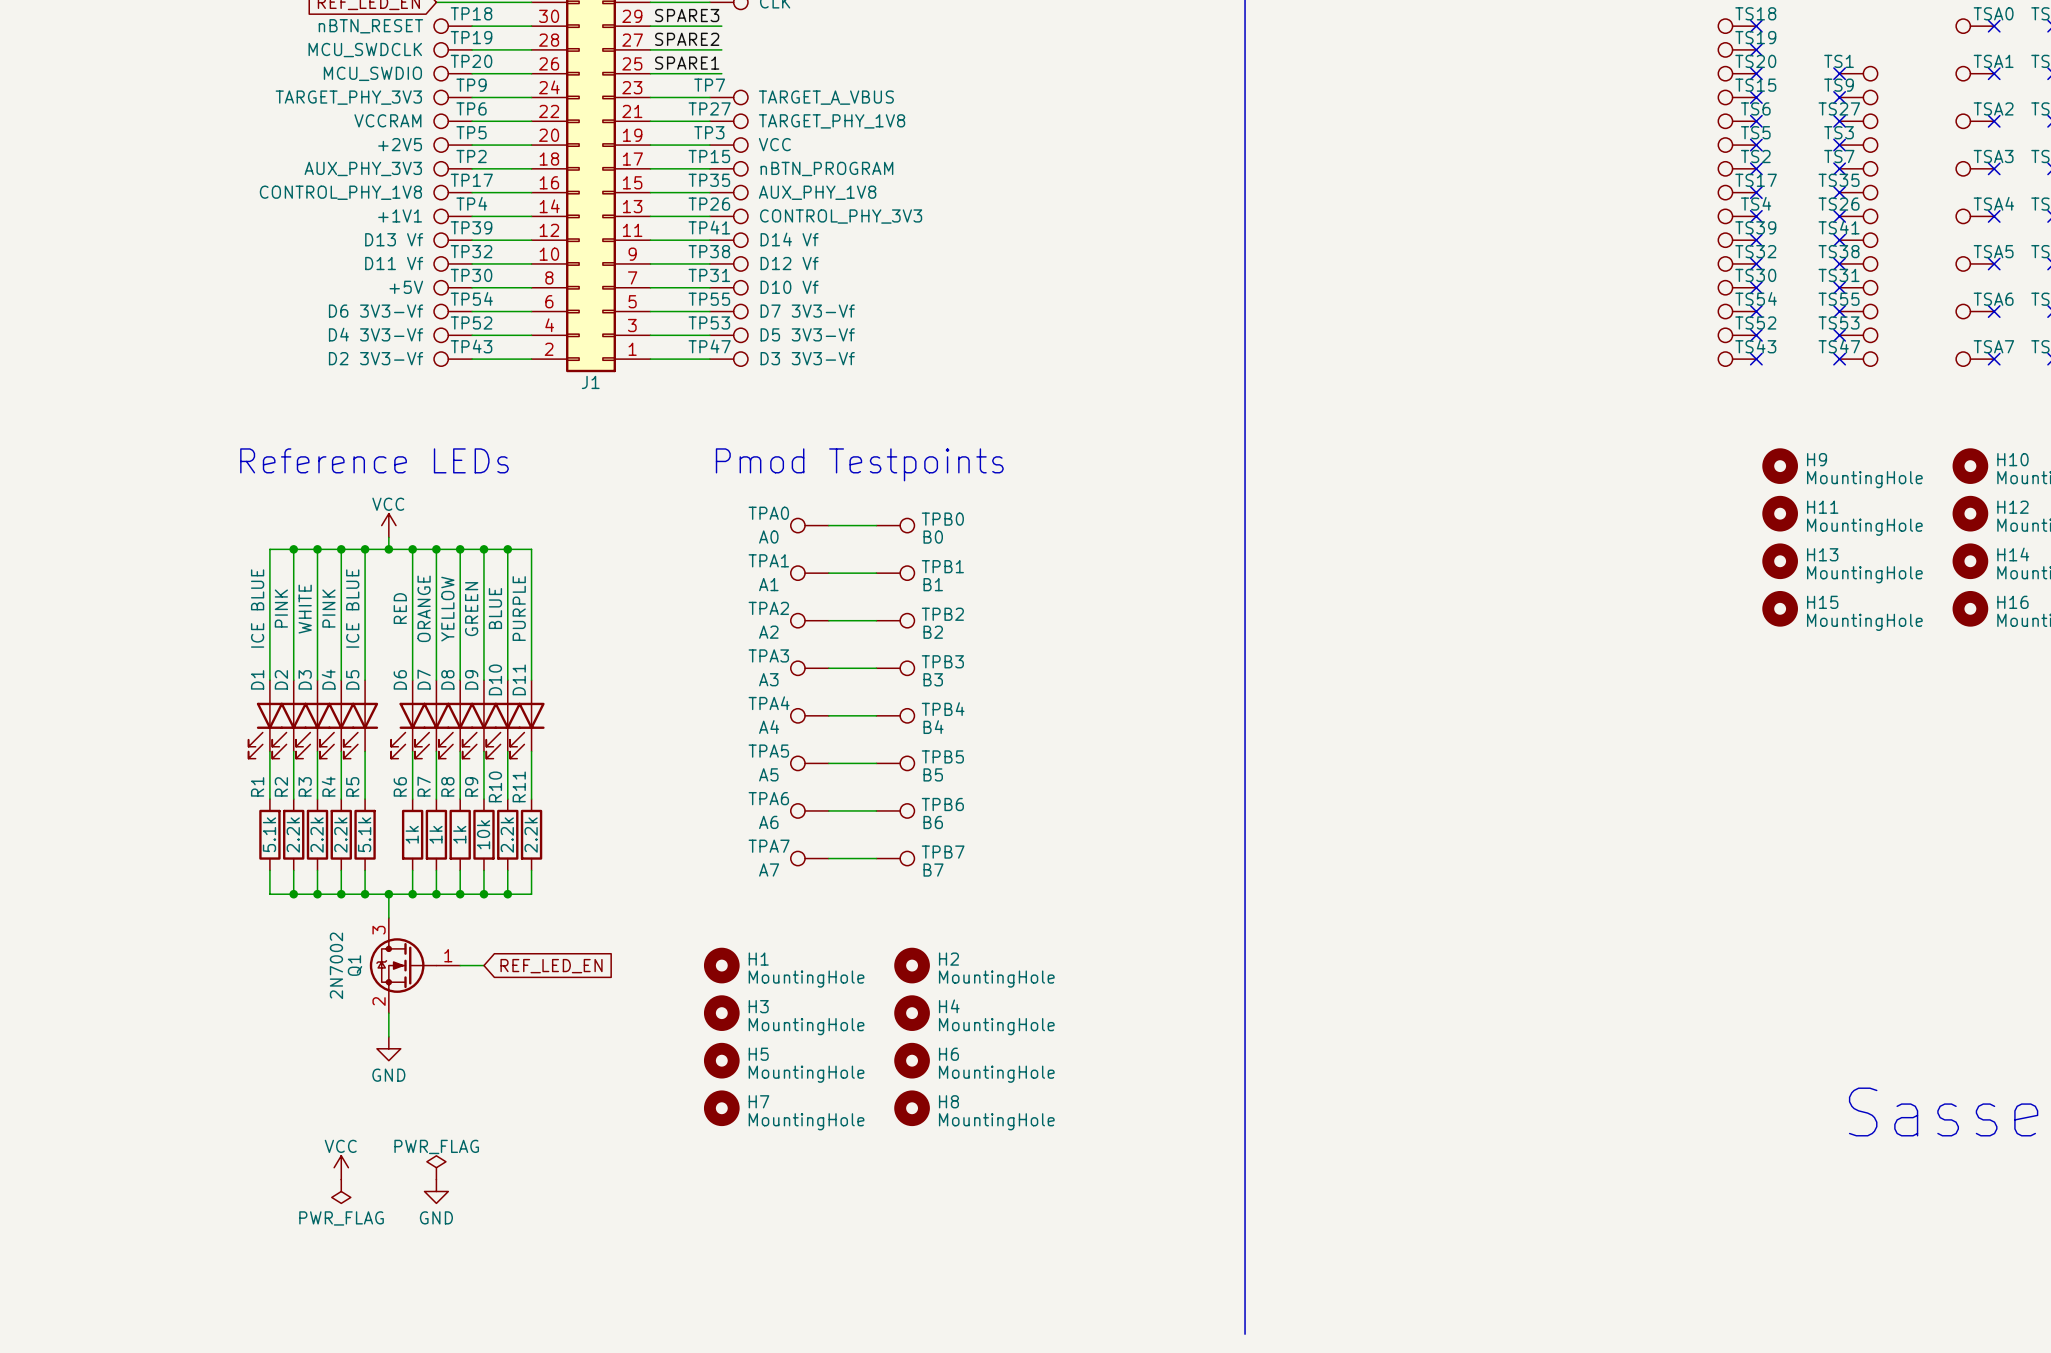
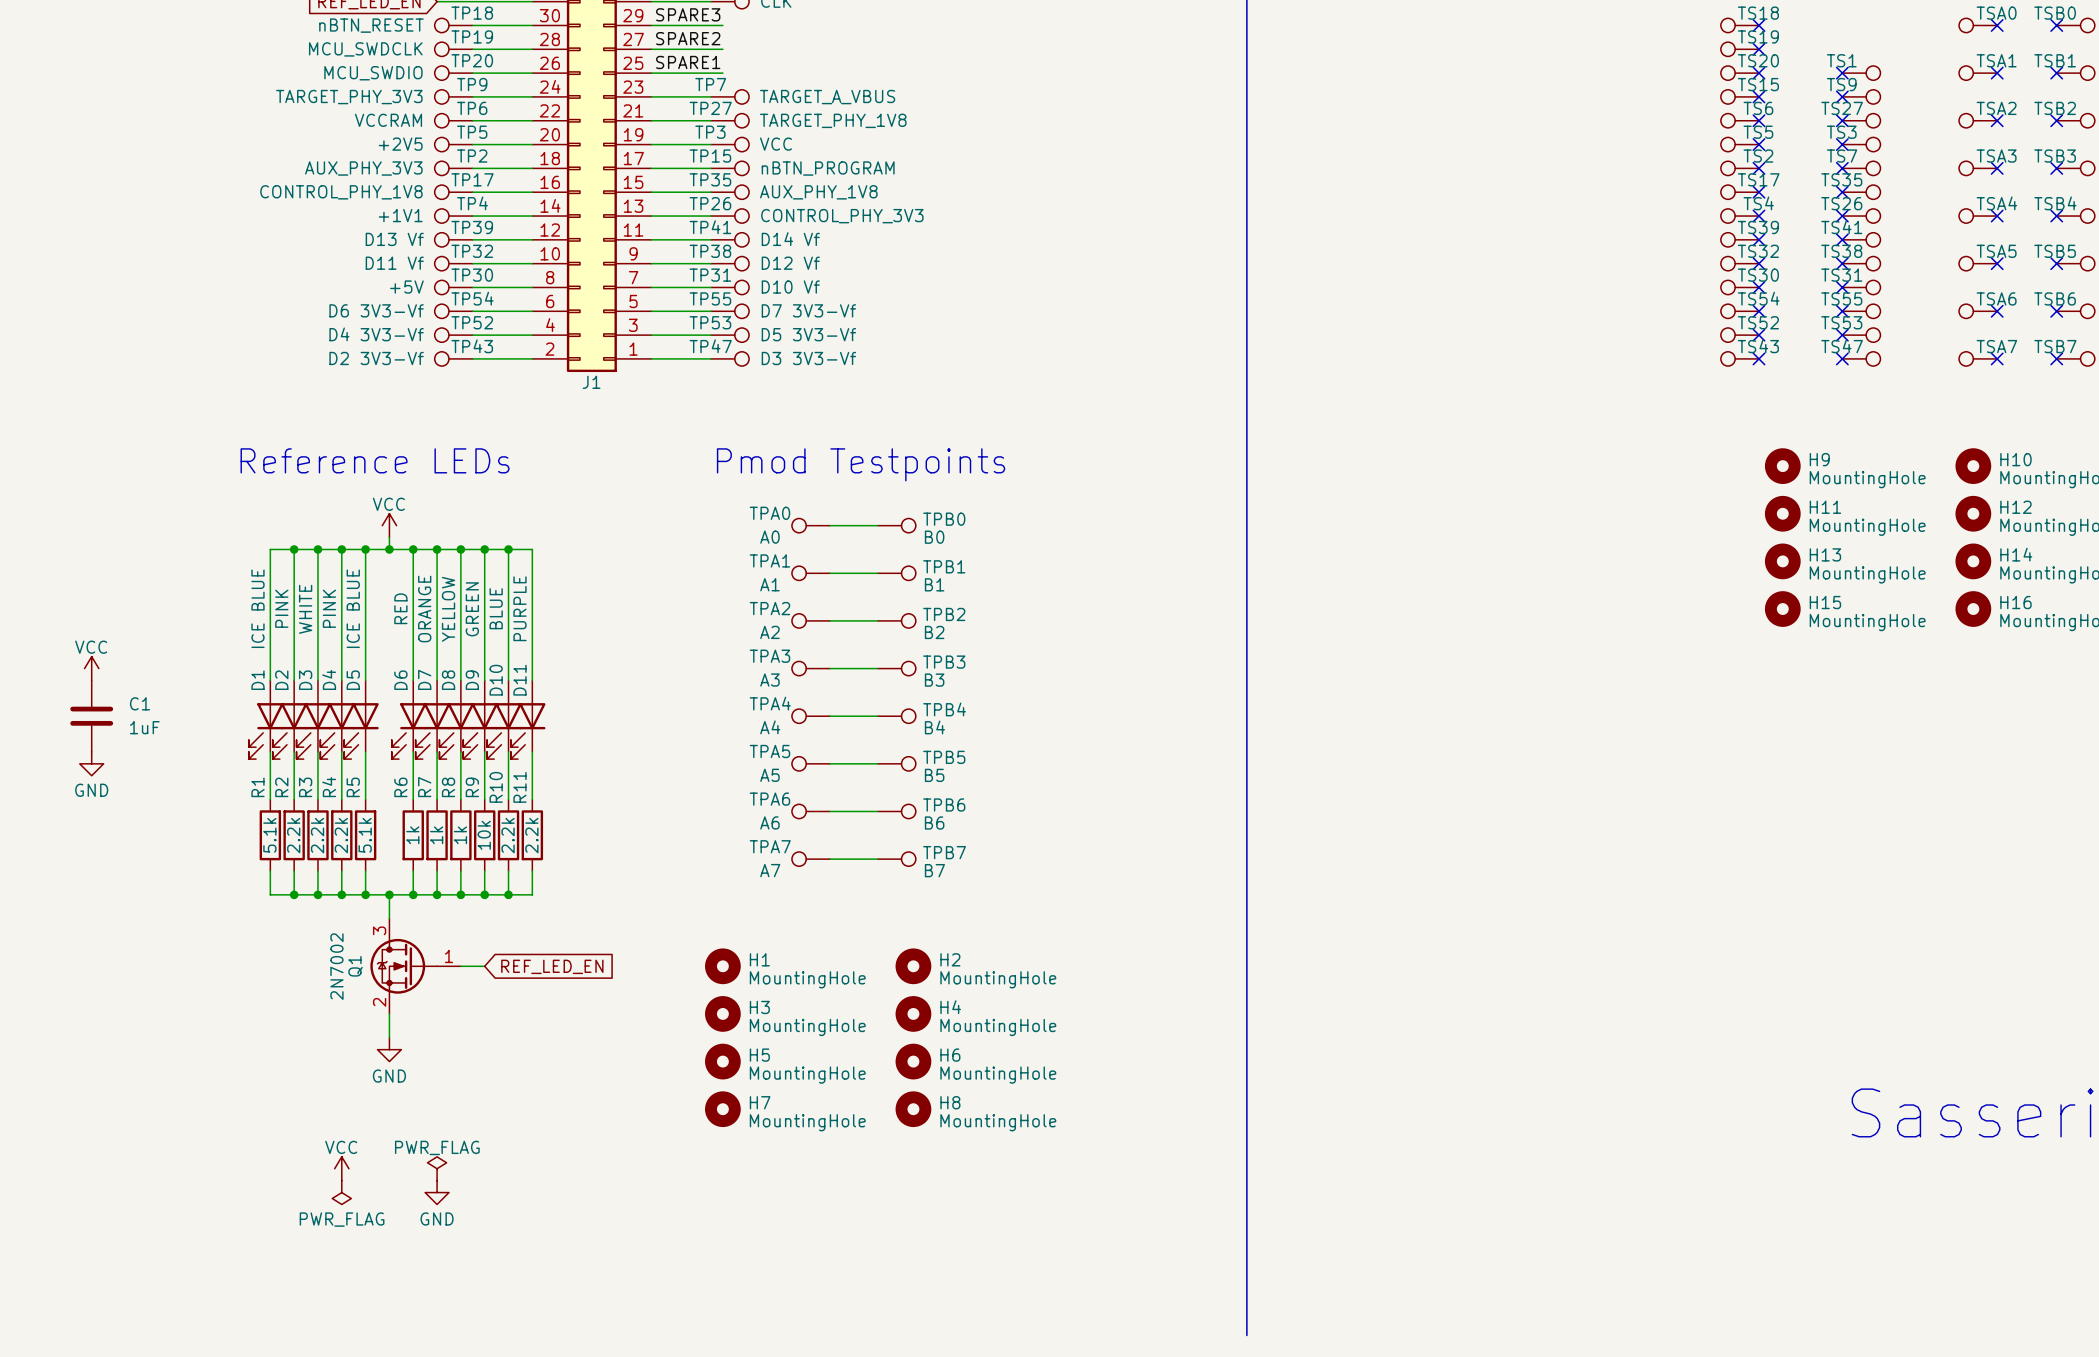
power symbol: none -> VCC (91, 668)
C1: none -> 1uF (91, 716)
power symbol: none -> GND (91, 763)

